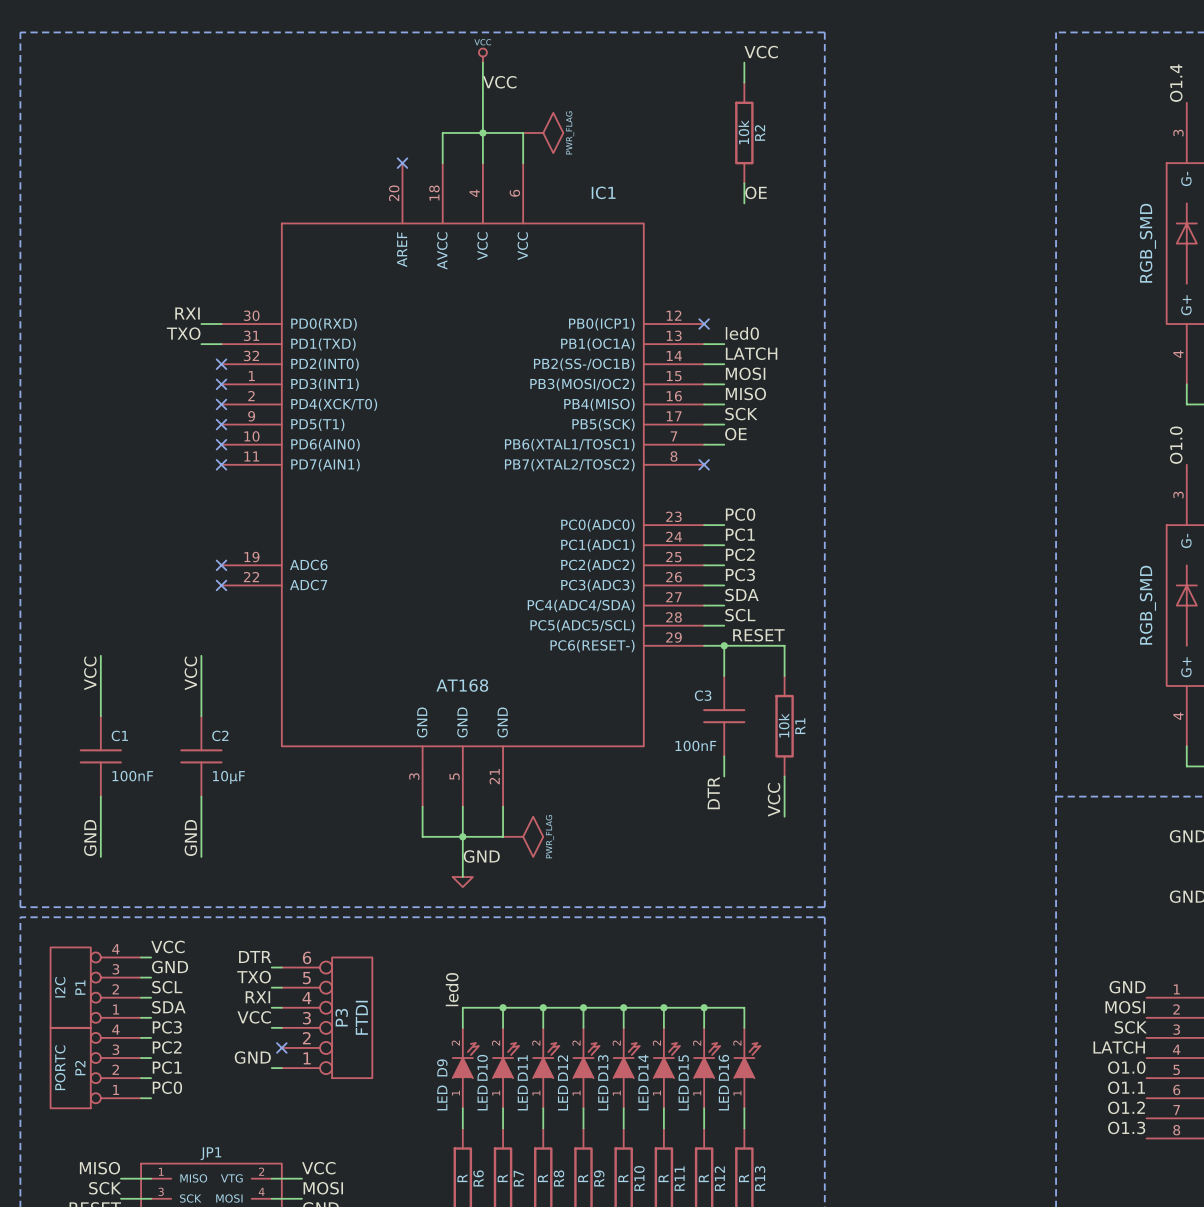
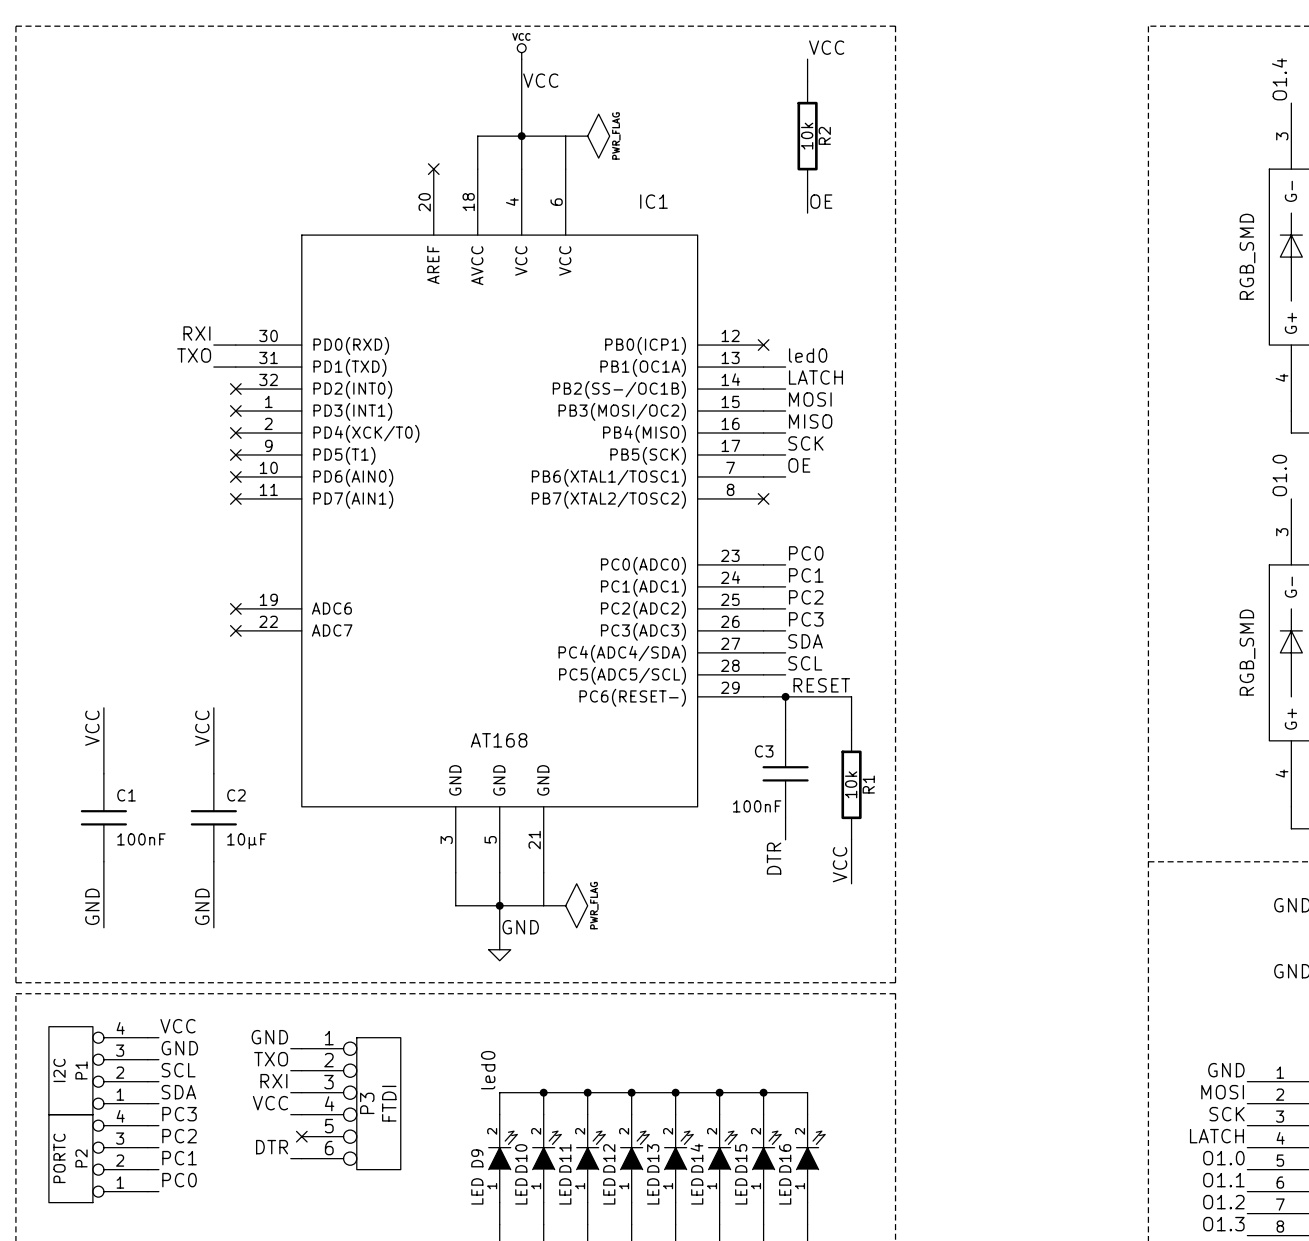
label: DTR (255, 957) -> GND (269, 1037)
P3 flip: as is (352, 1017) -> up-down (378, 1103)
label: GND (252, 1057) -> DTR (272, 1147)

